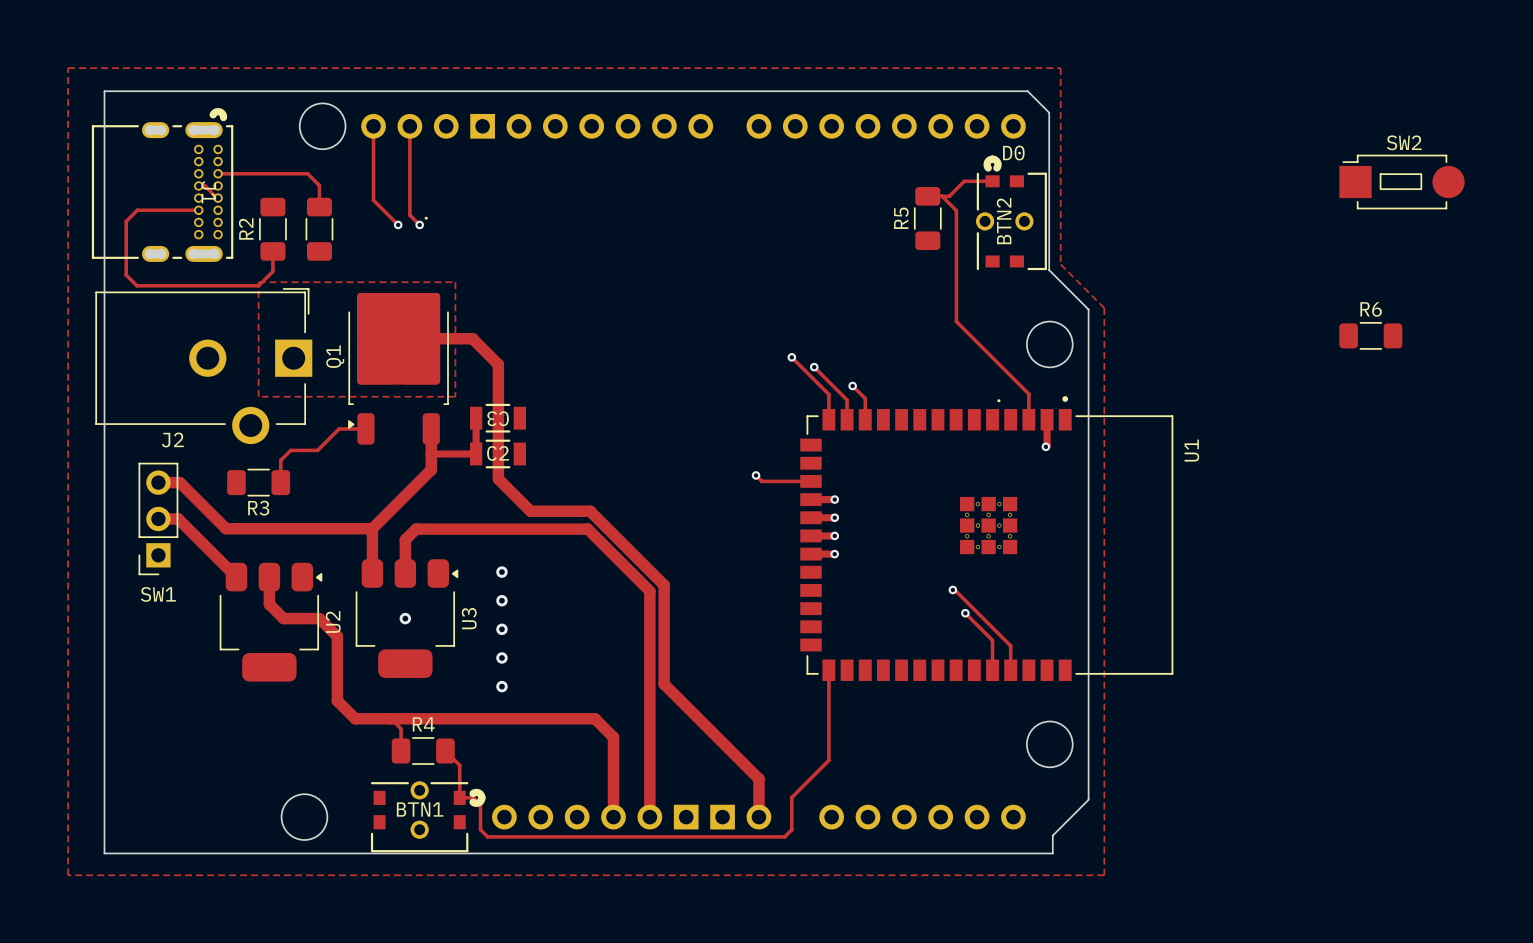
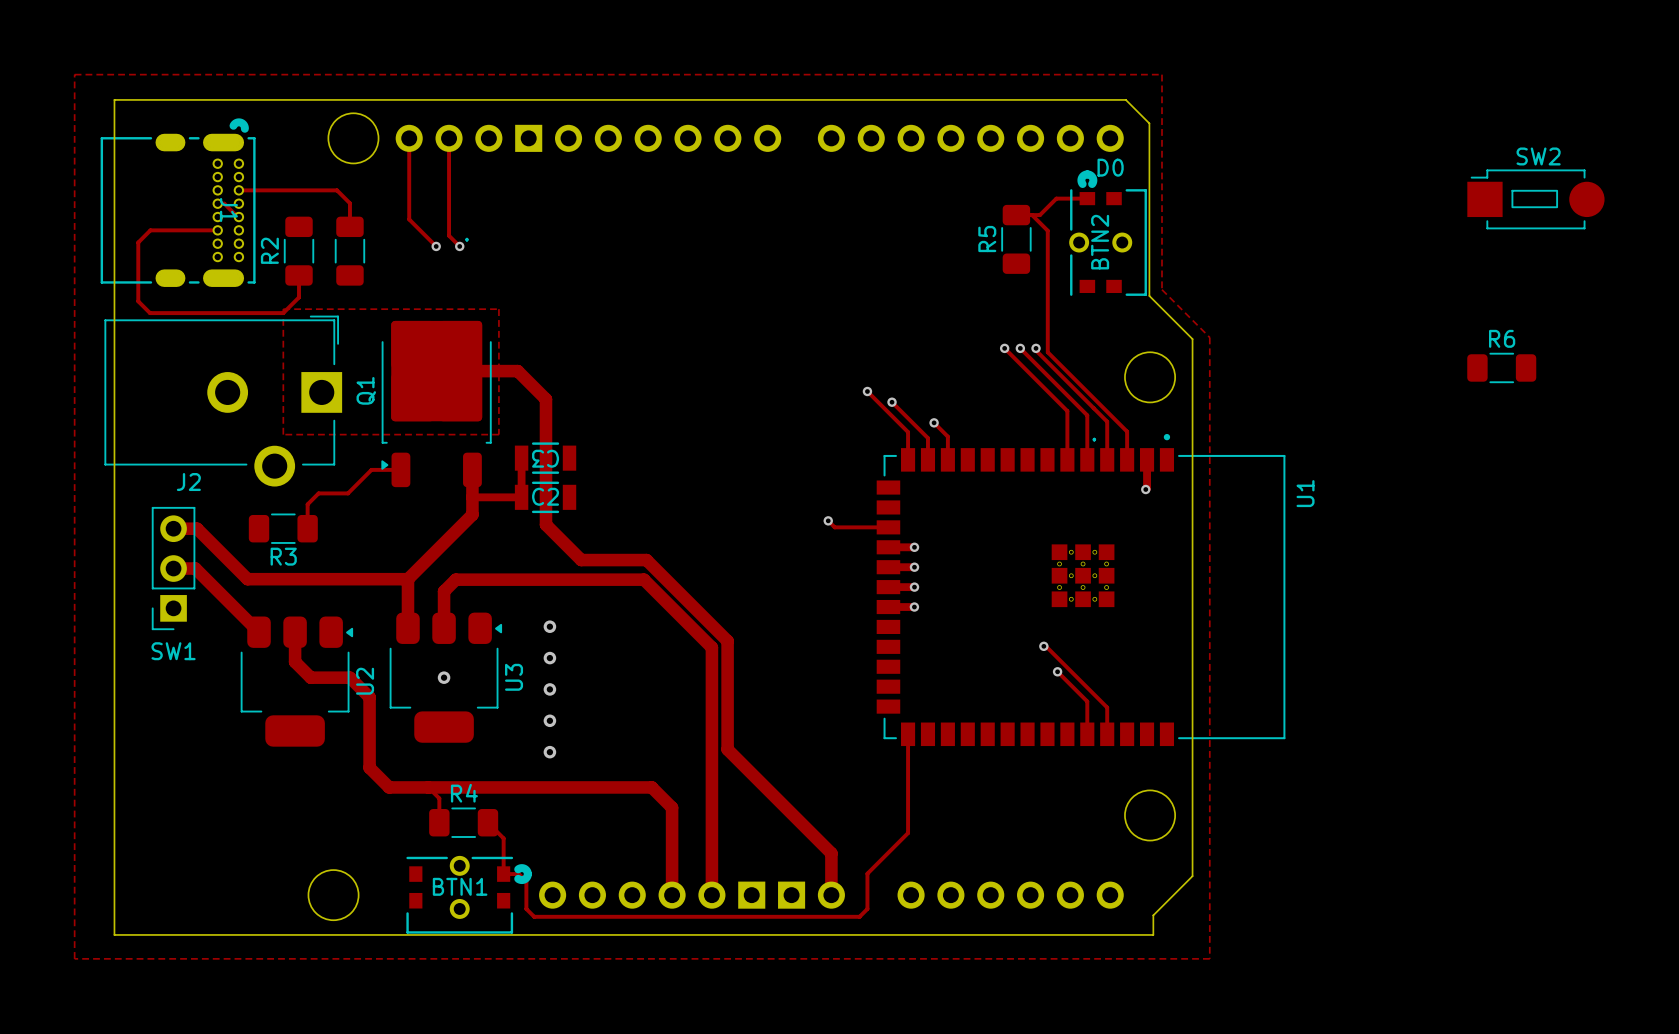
track: none -> (1004, 348) (1067, 411) (1067, 459)
via: none -> (1004, 348)
track: none -> (1020, 348) (1087, 415) (1087, 459)
via: none -> (1020, 348)
track: none -> (1036, 348) (1107, 421) (1107, 459)
via: none -> (1036, 348)

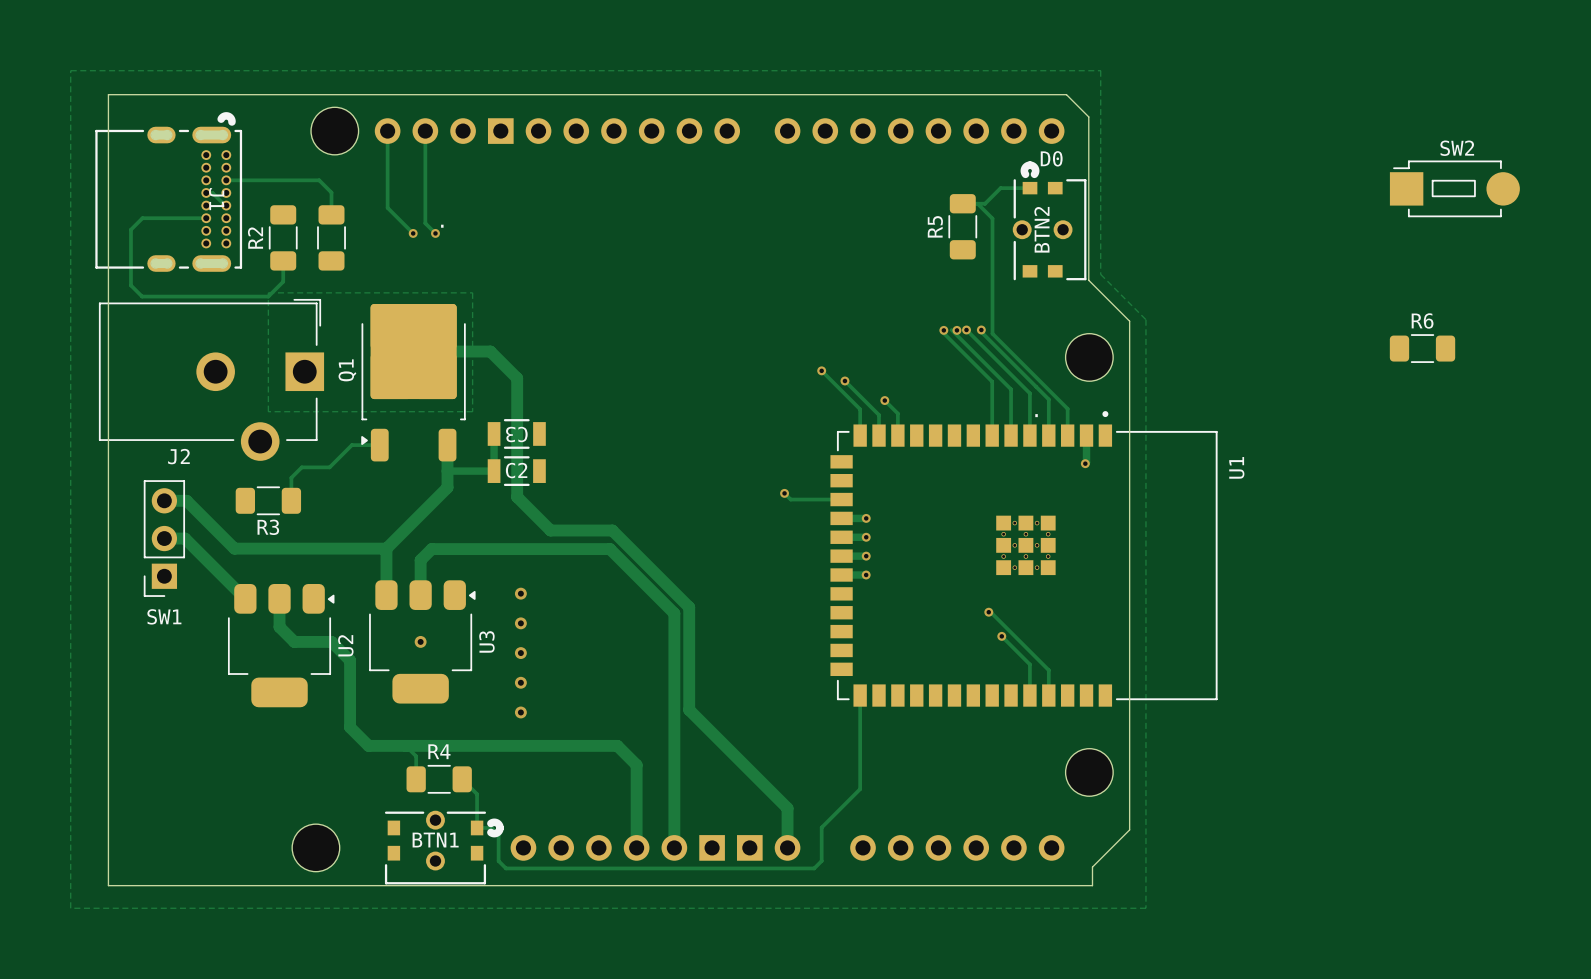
track: none -> (943, 330) (943, 333) (992, 381) (992, 435)
via: none -> (943, 330)
via: (1004, 348) -> none
via: none -> (956, 330)

